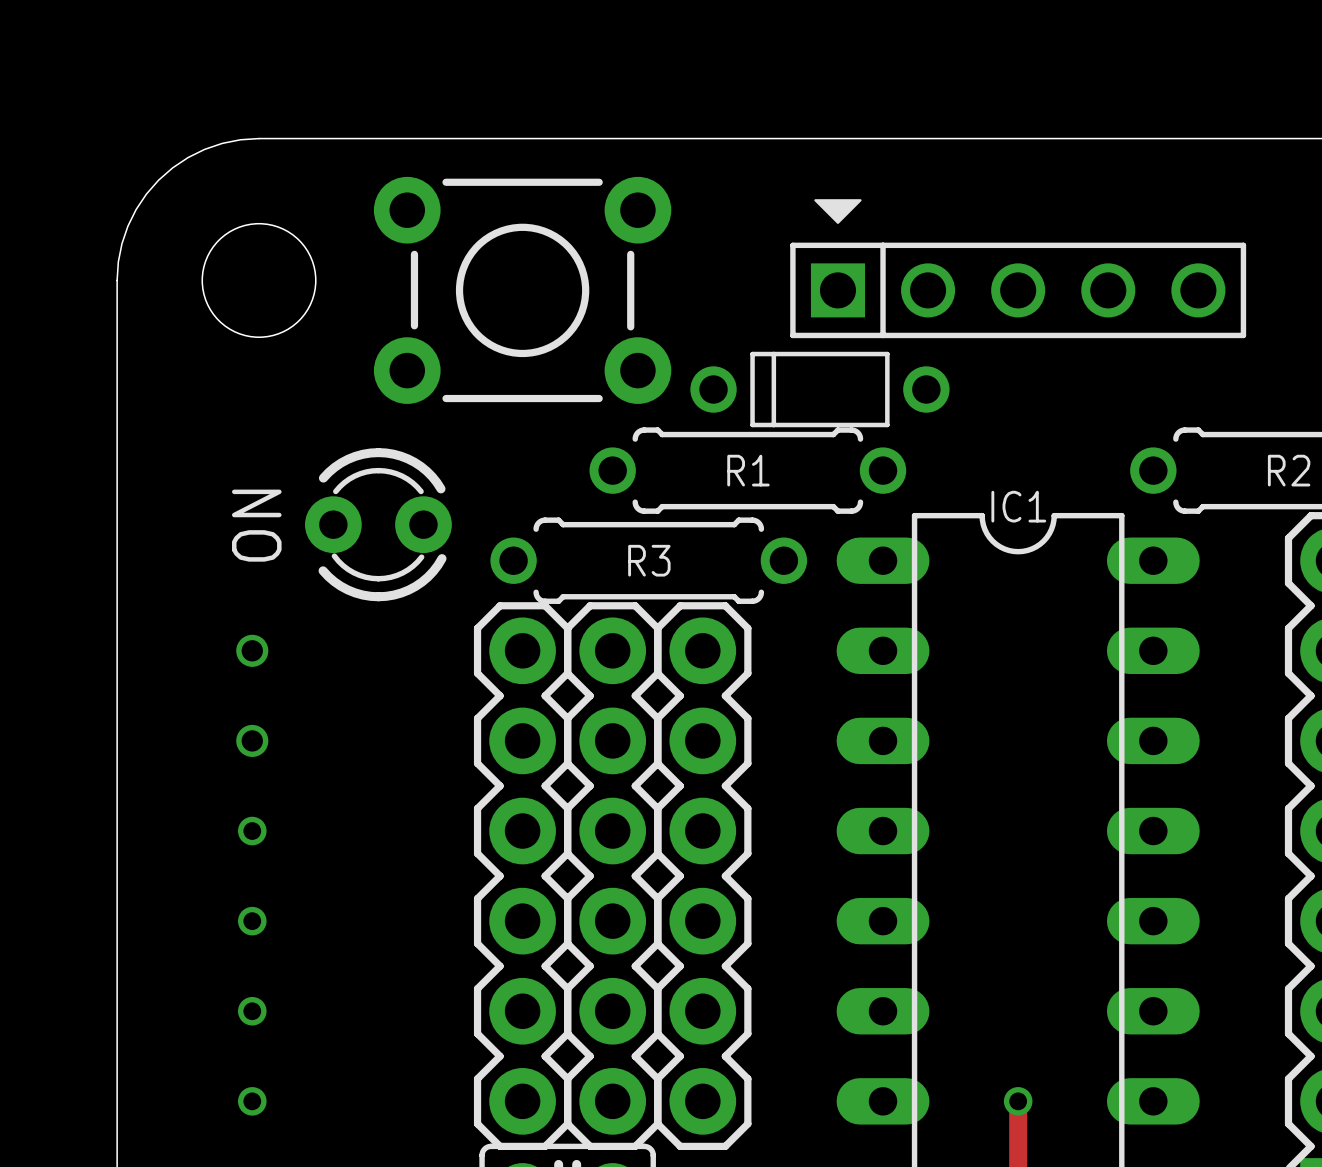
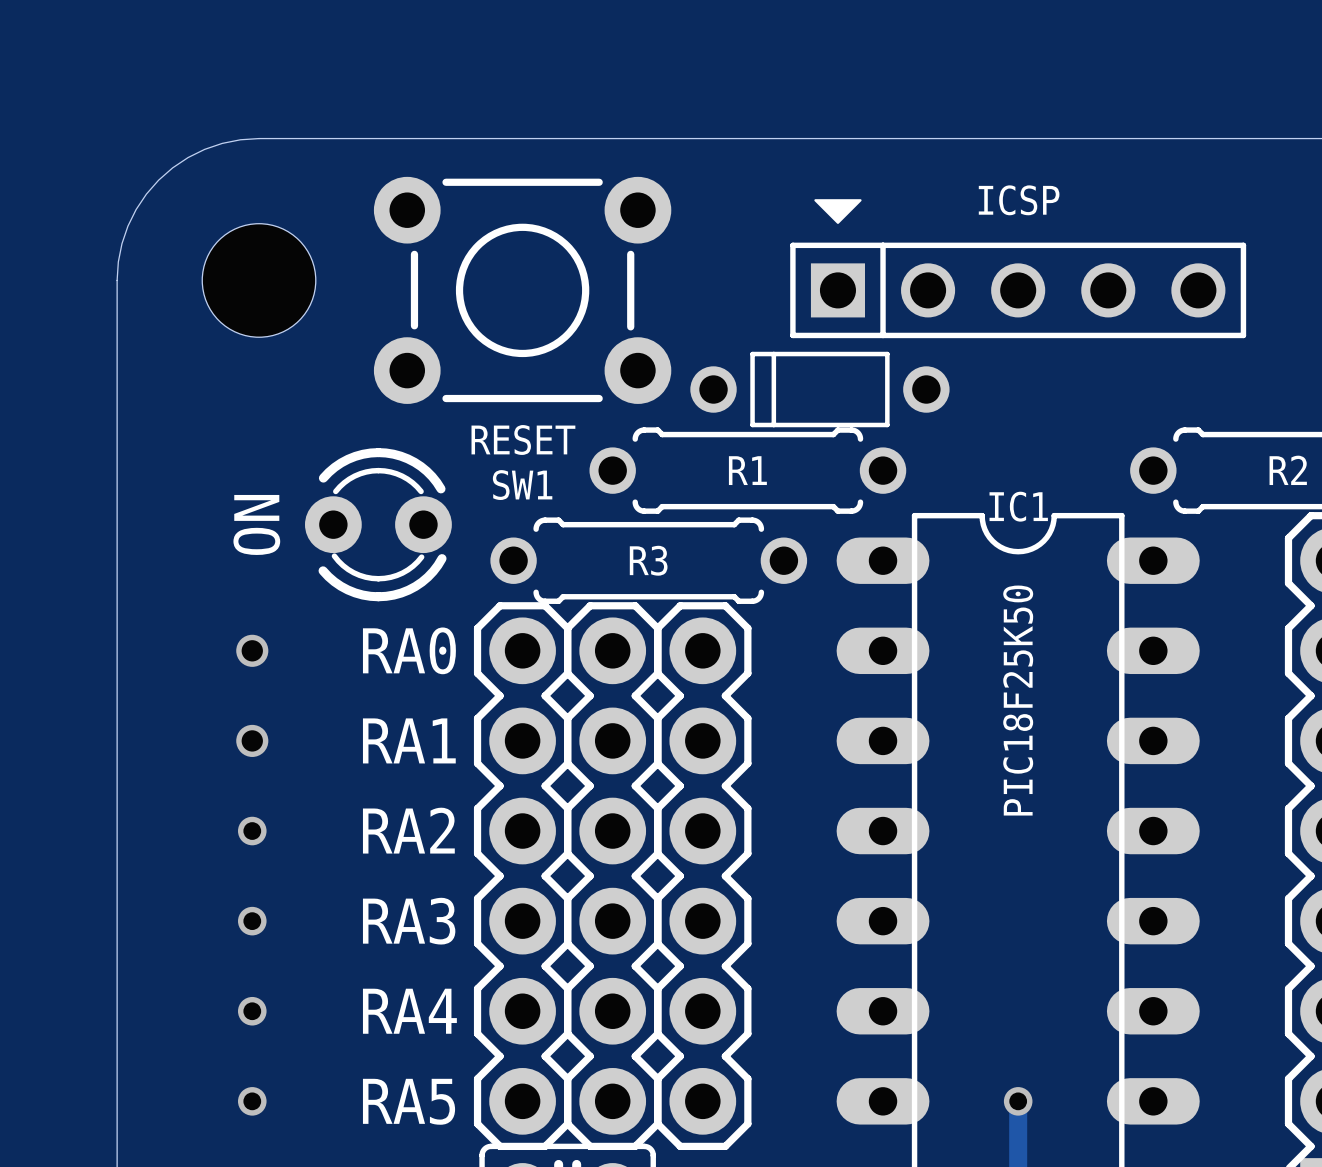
text: none -> ICSP (1019, 200)
text: none -> RESET (523, 439)
text: none -> SW1 (522, 485)
text: none -> RA0 (409, 650)
IC1 value: none -> PIC18F25K50 (1018, 700)
text: none -> RA1 (409, 740)
text: none -> RA2 (408, 830)
text: none -> RA3 (409, 921)
text: none -> RA4 (409, 1011)
text: none -> RA5 (409, 1101)

